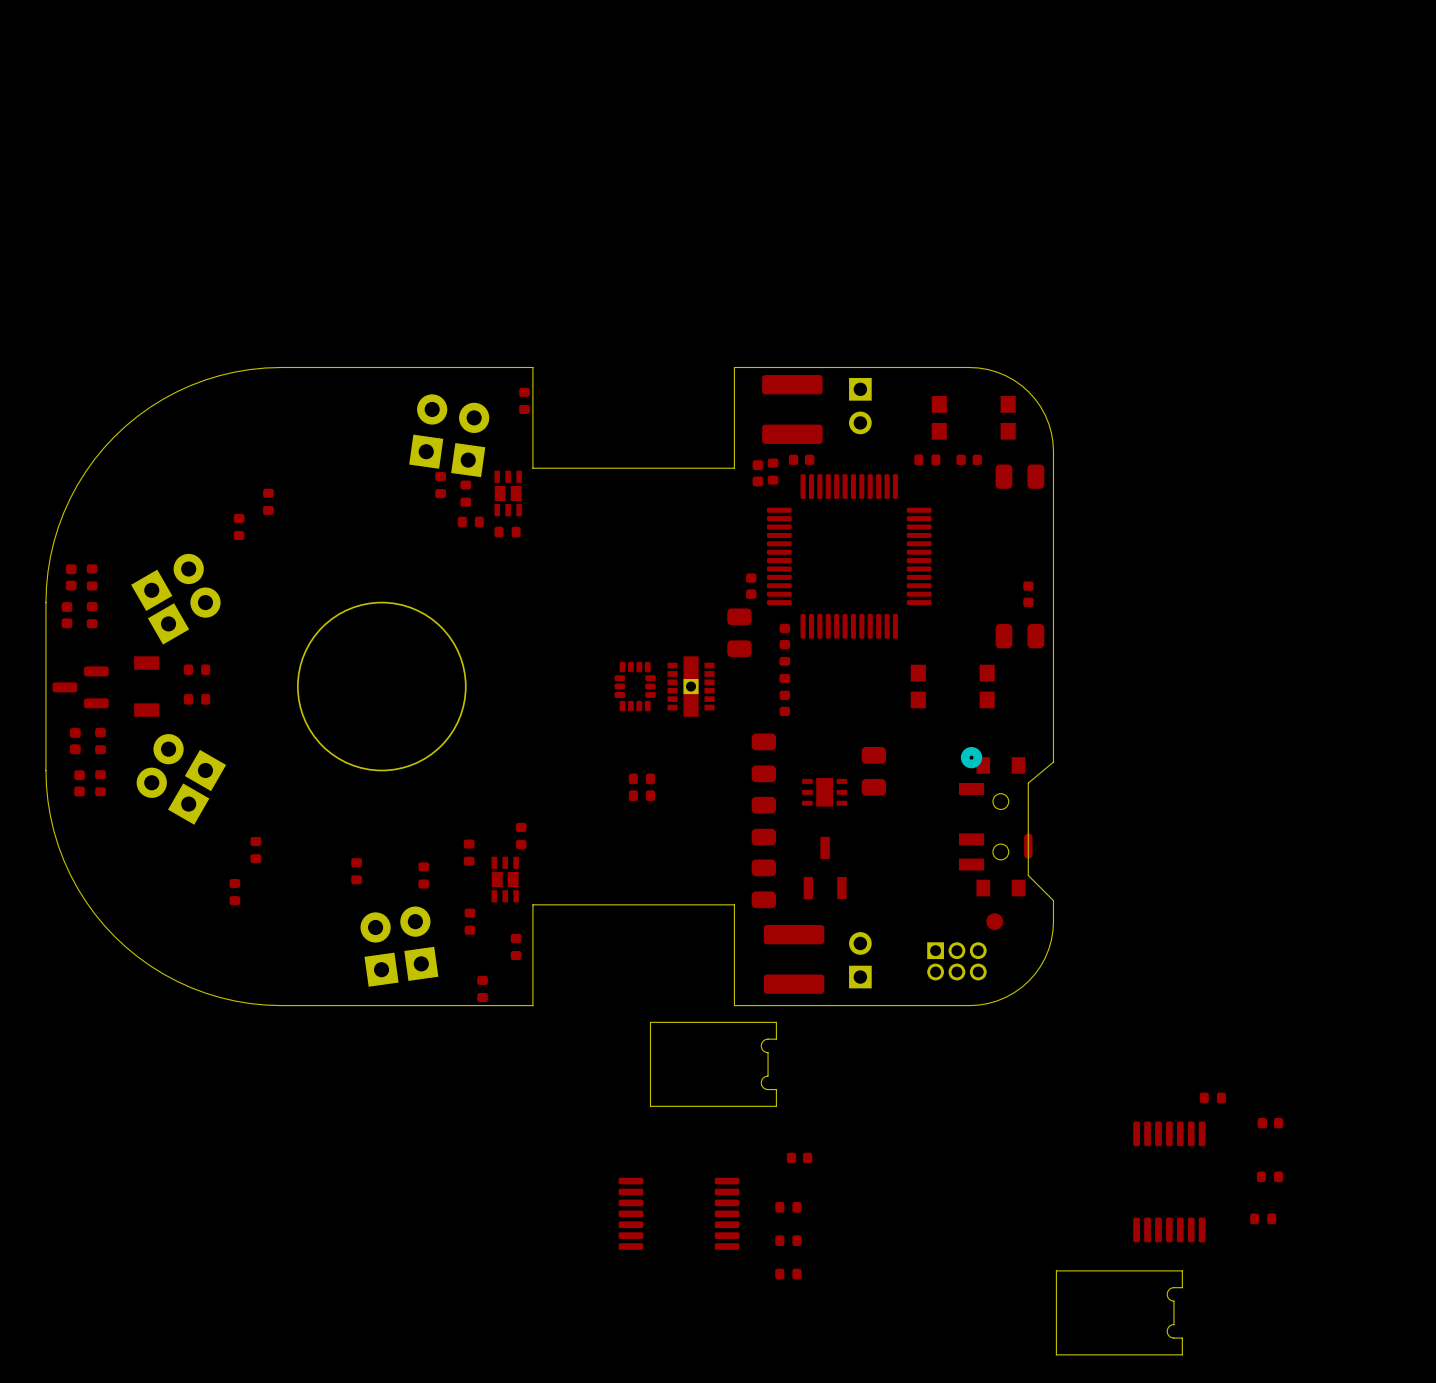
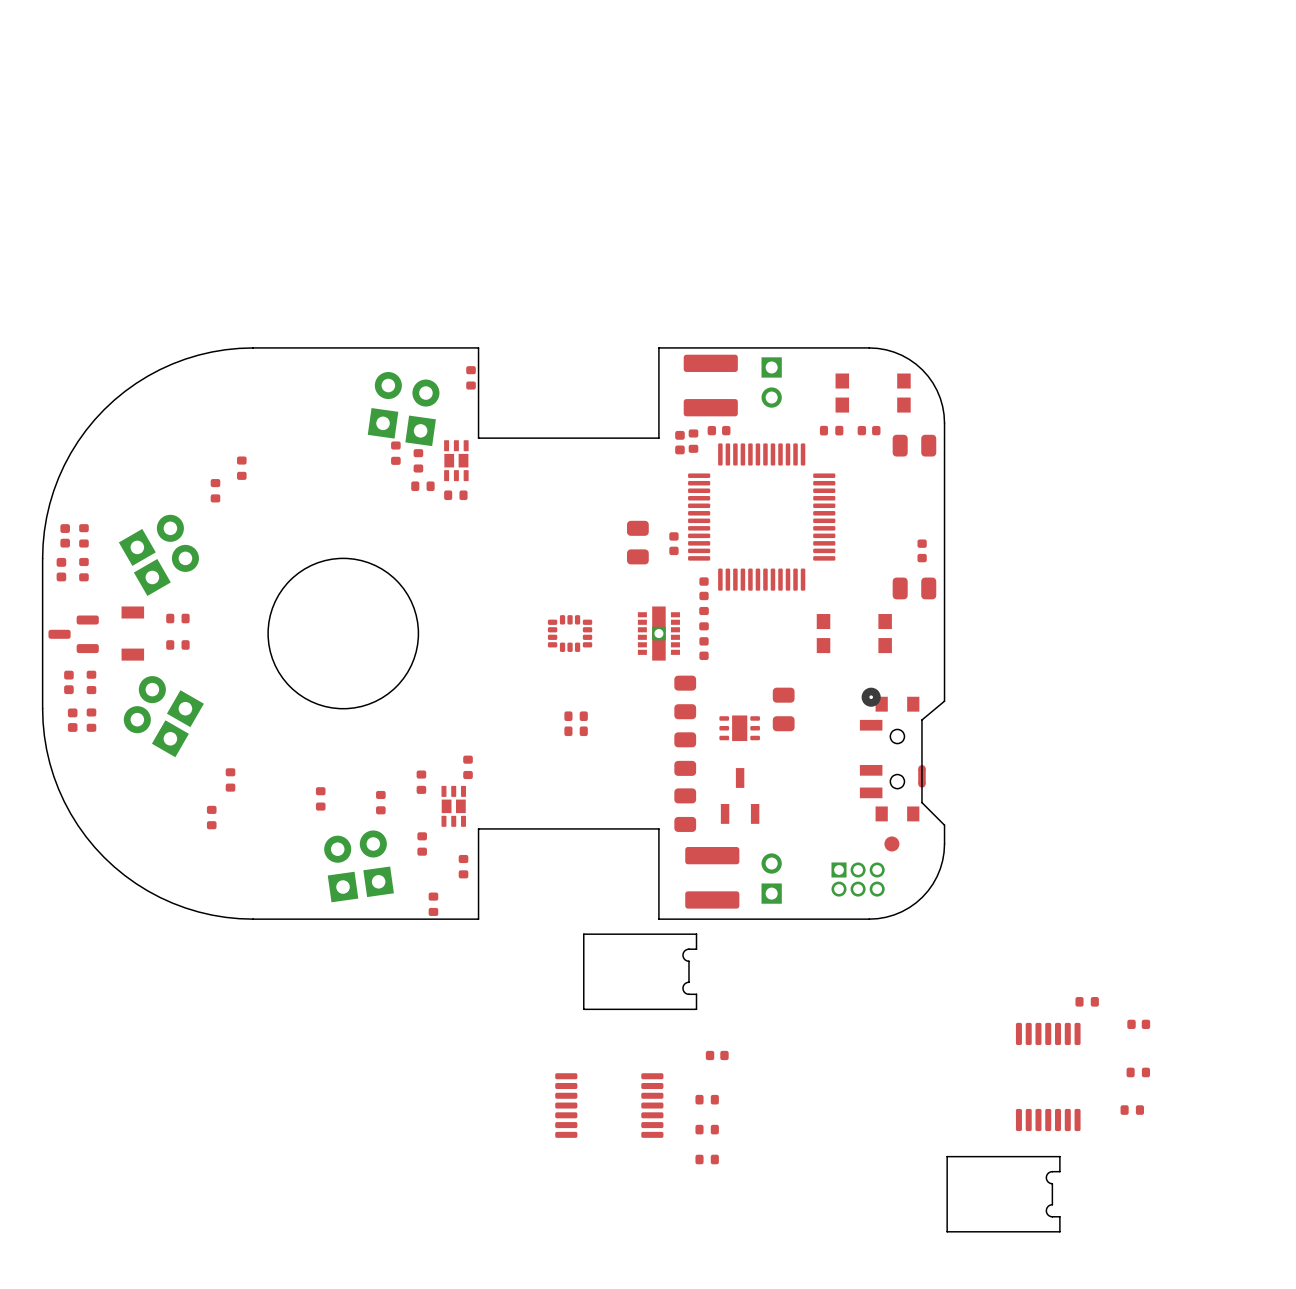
part position: (739, 632) -> (637, 542)
part rotation: 0° (635, 686) -> 90° clockwise (570, 633)
part position: (691, 686) -> (658, 633)

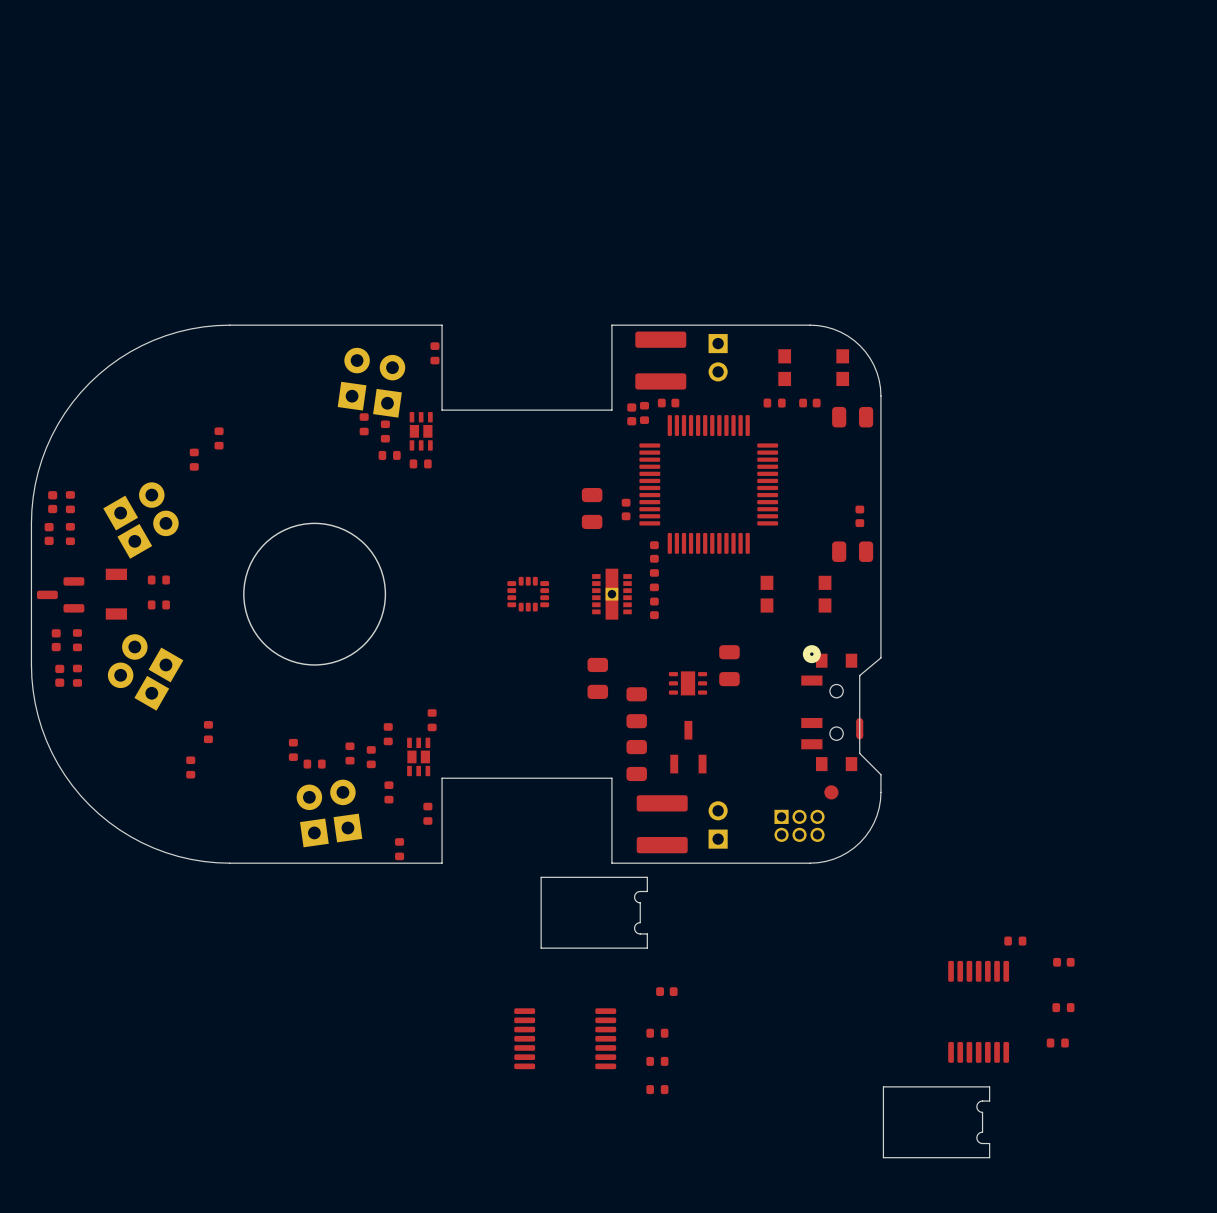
part position: (685, 697) -> (597, 678)
part: (576, 716) -> none
part: (576, 731) -> none
part: none -> (371, 757)
part: none -> (314, 764)

